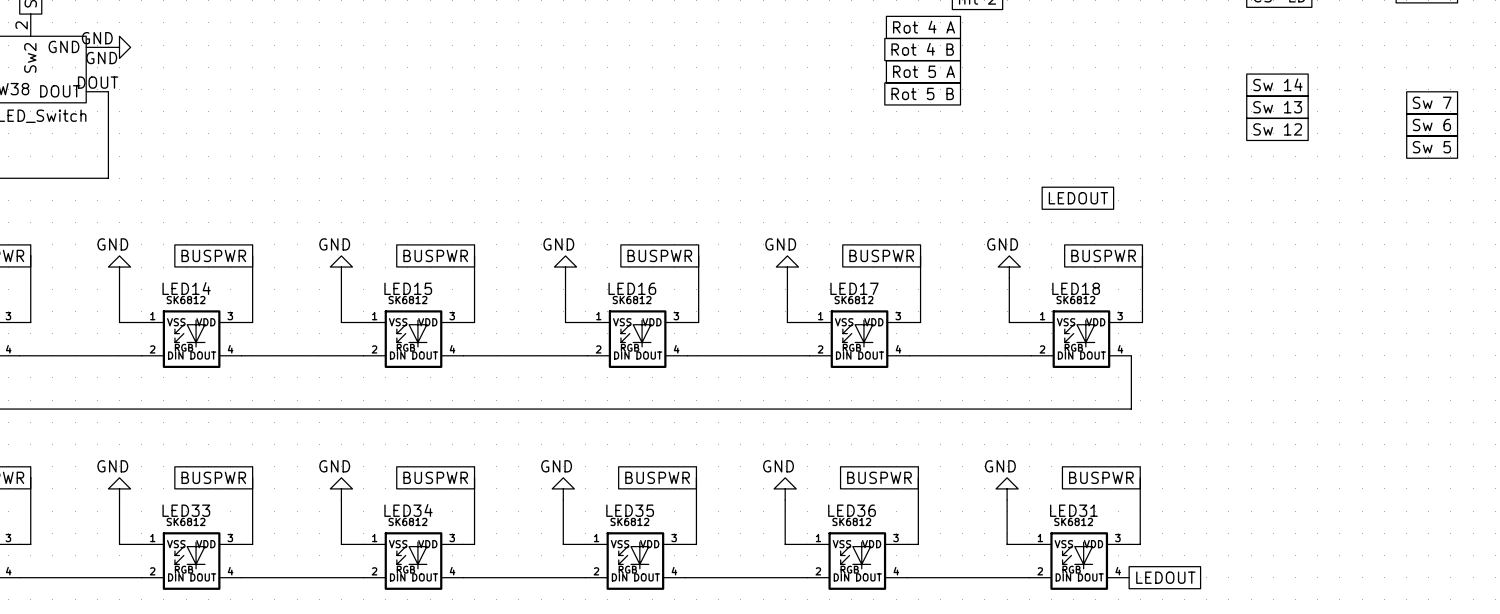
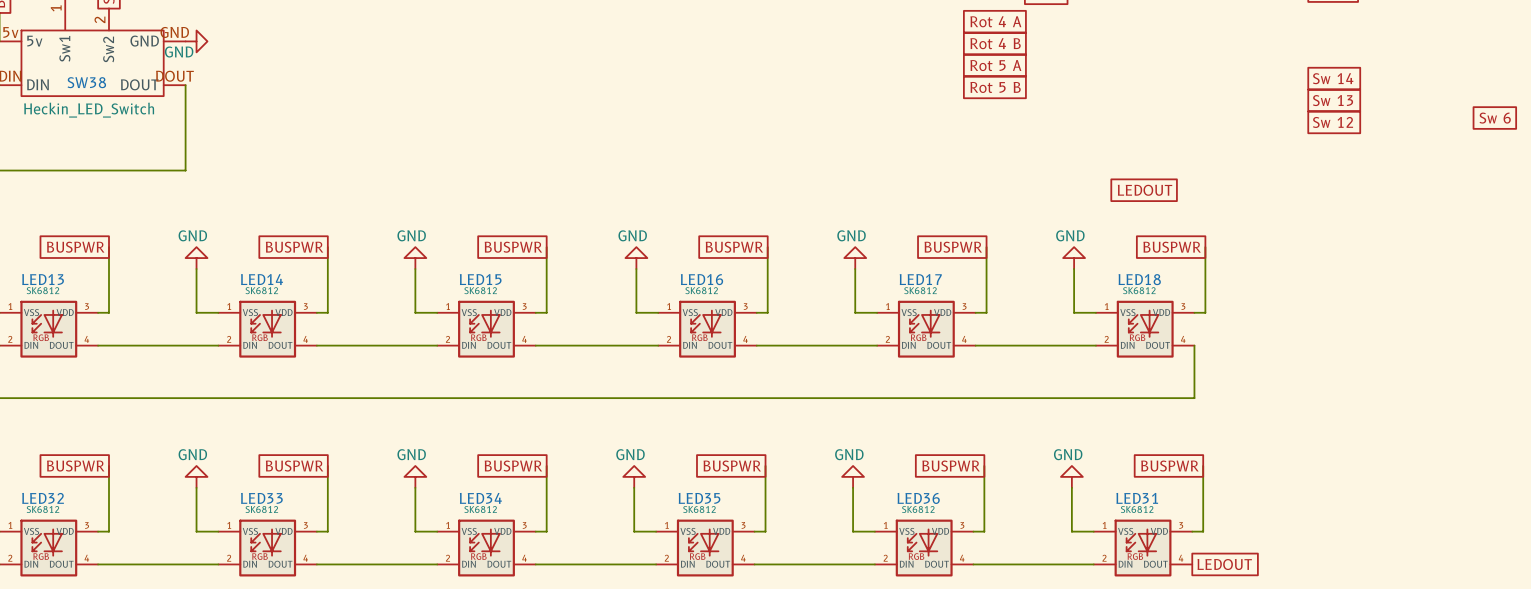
global label: Sw 7 (1432, 102) -> none
global label: Sw 5 (1431, 147) -> none

